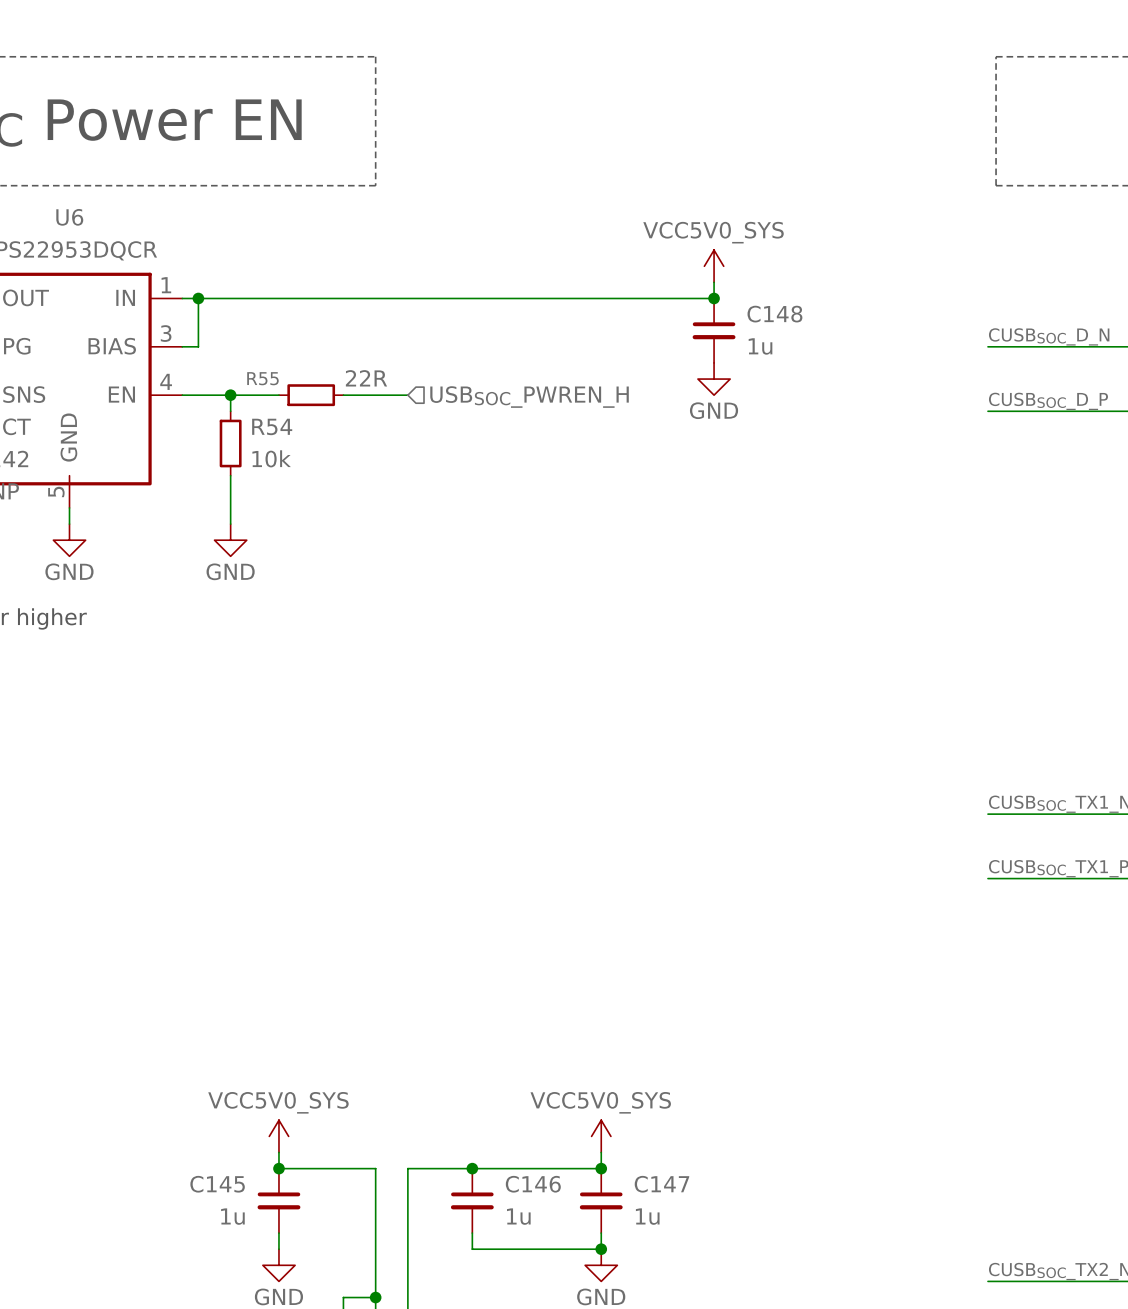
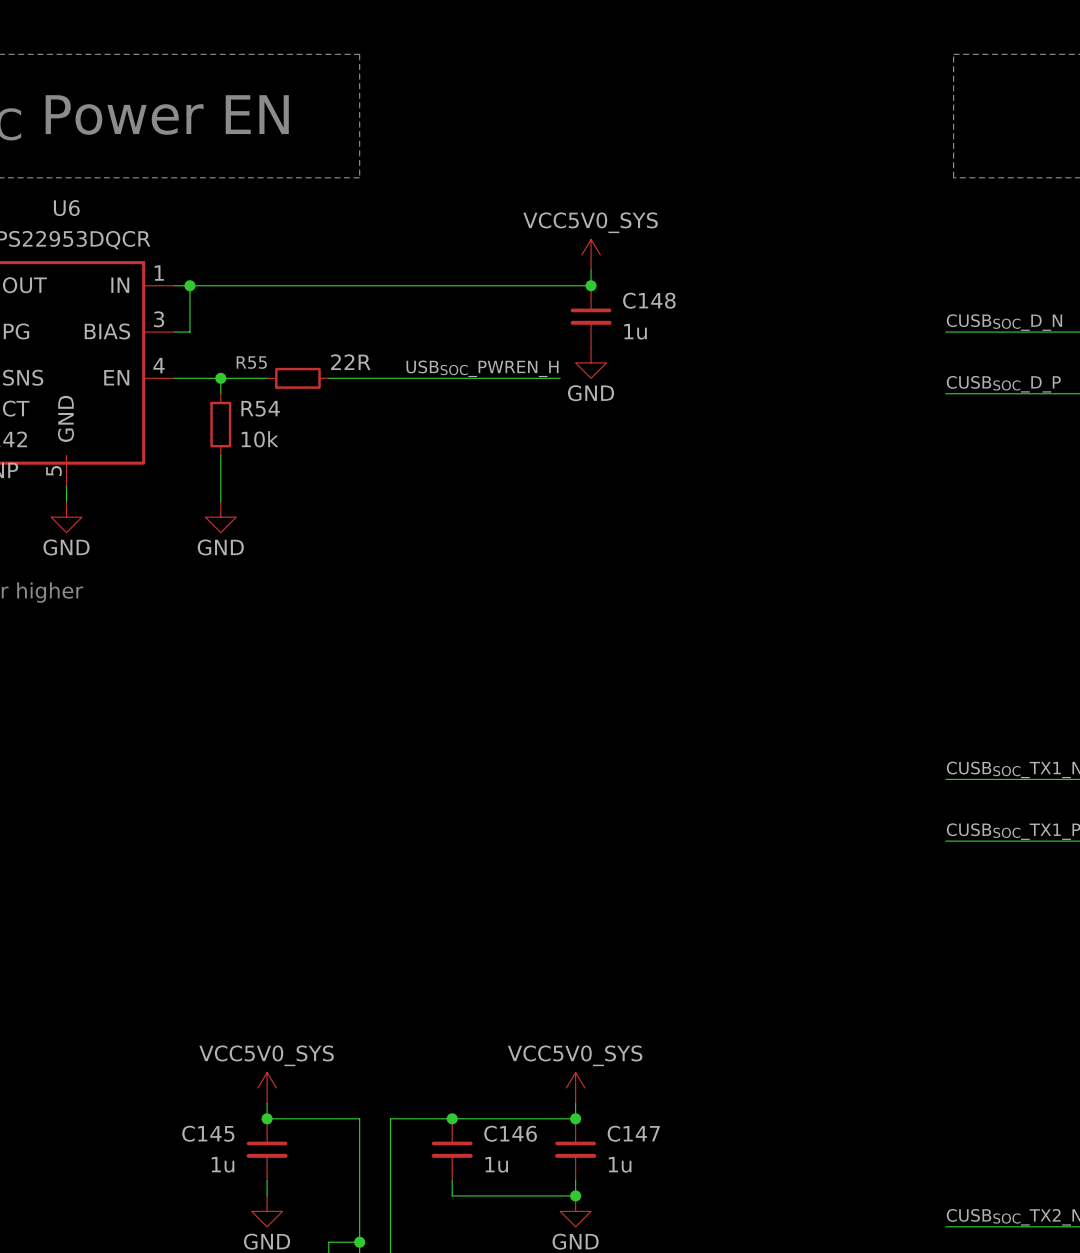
power symbol position: VCC5V0_SYS (714, 266) -> VCC5V0_SYS (591, 254)
wire: (714, 282) (714, 298) (617, 298) -> (591, 270) (591, 285)
junction: none -> (591, 285)
junction: (714, 298) -> none
C148 position: (714, 330) -> (591, 316)
power symbol position: GND (714, 379) -> GND (591, 362)
label: none -> USBSOC_PWREN_H (482, 368)
wire: none -> (390, 378) (560, 378)
hierarchical label: USBSOC_PWREN_H (529, 397) -> none

